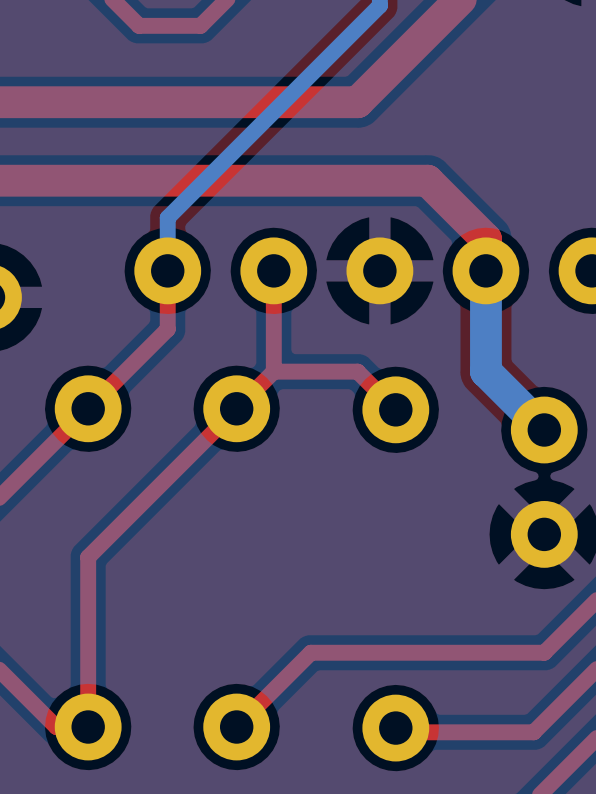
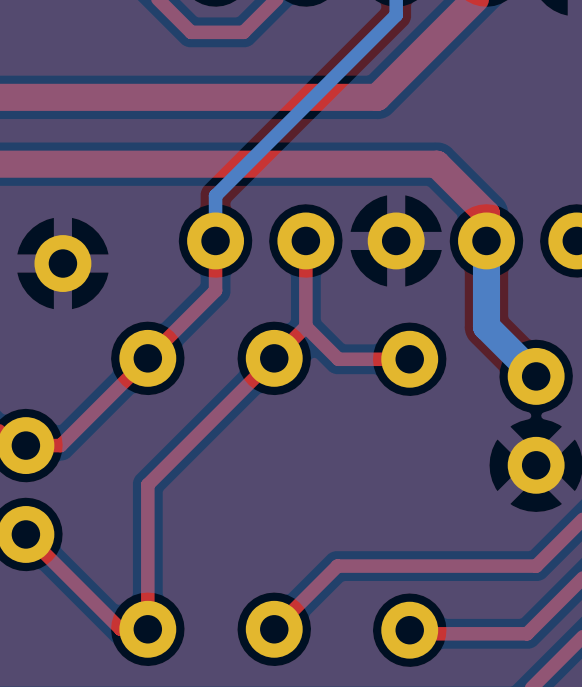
top track: (273, 371) (357, 371) (395, 409) -> (305, 326) (338, 359) (409, 359)

